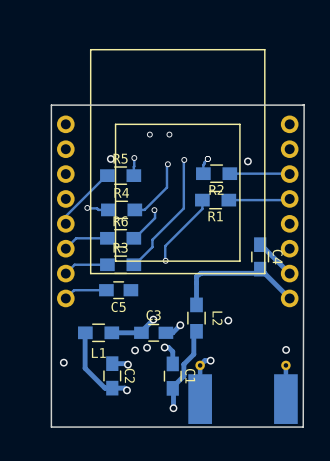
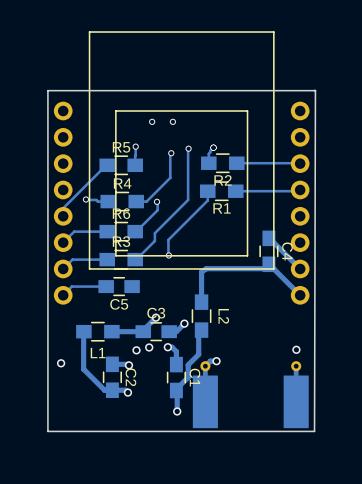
via: (110, 158) -> none
via: (247, 161) -> none
via: (228, 320) -> none

